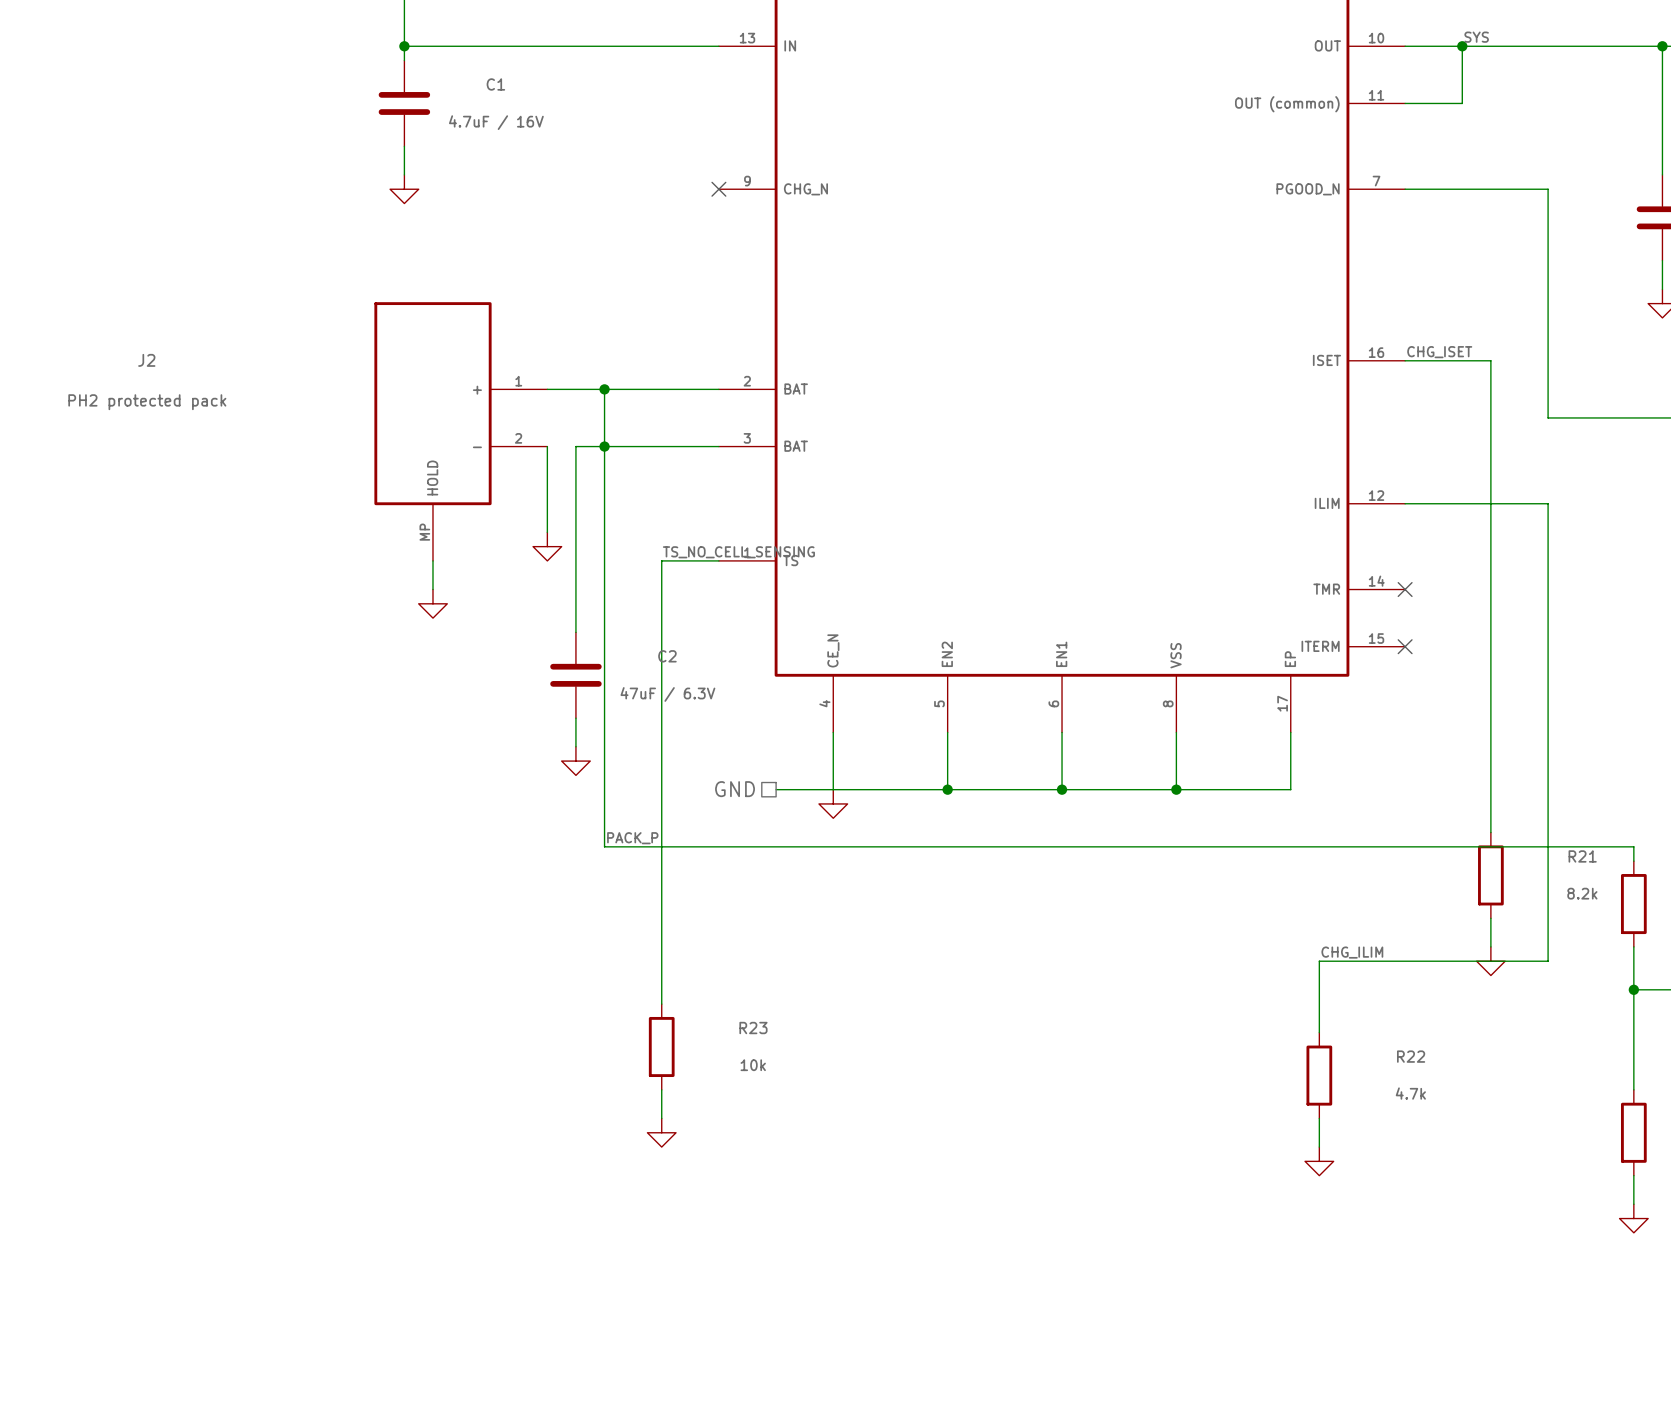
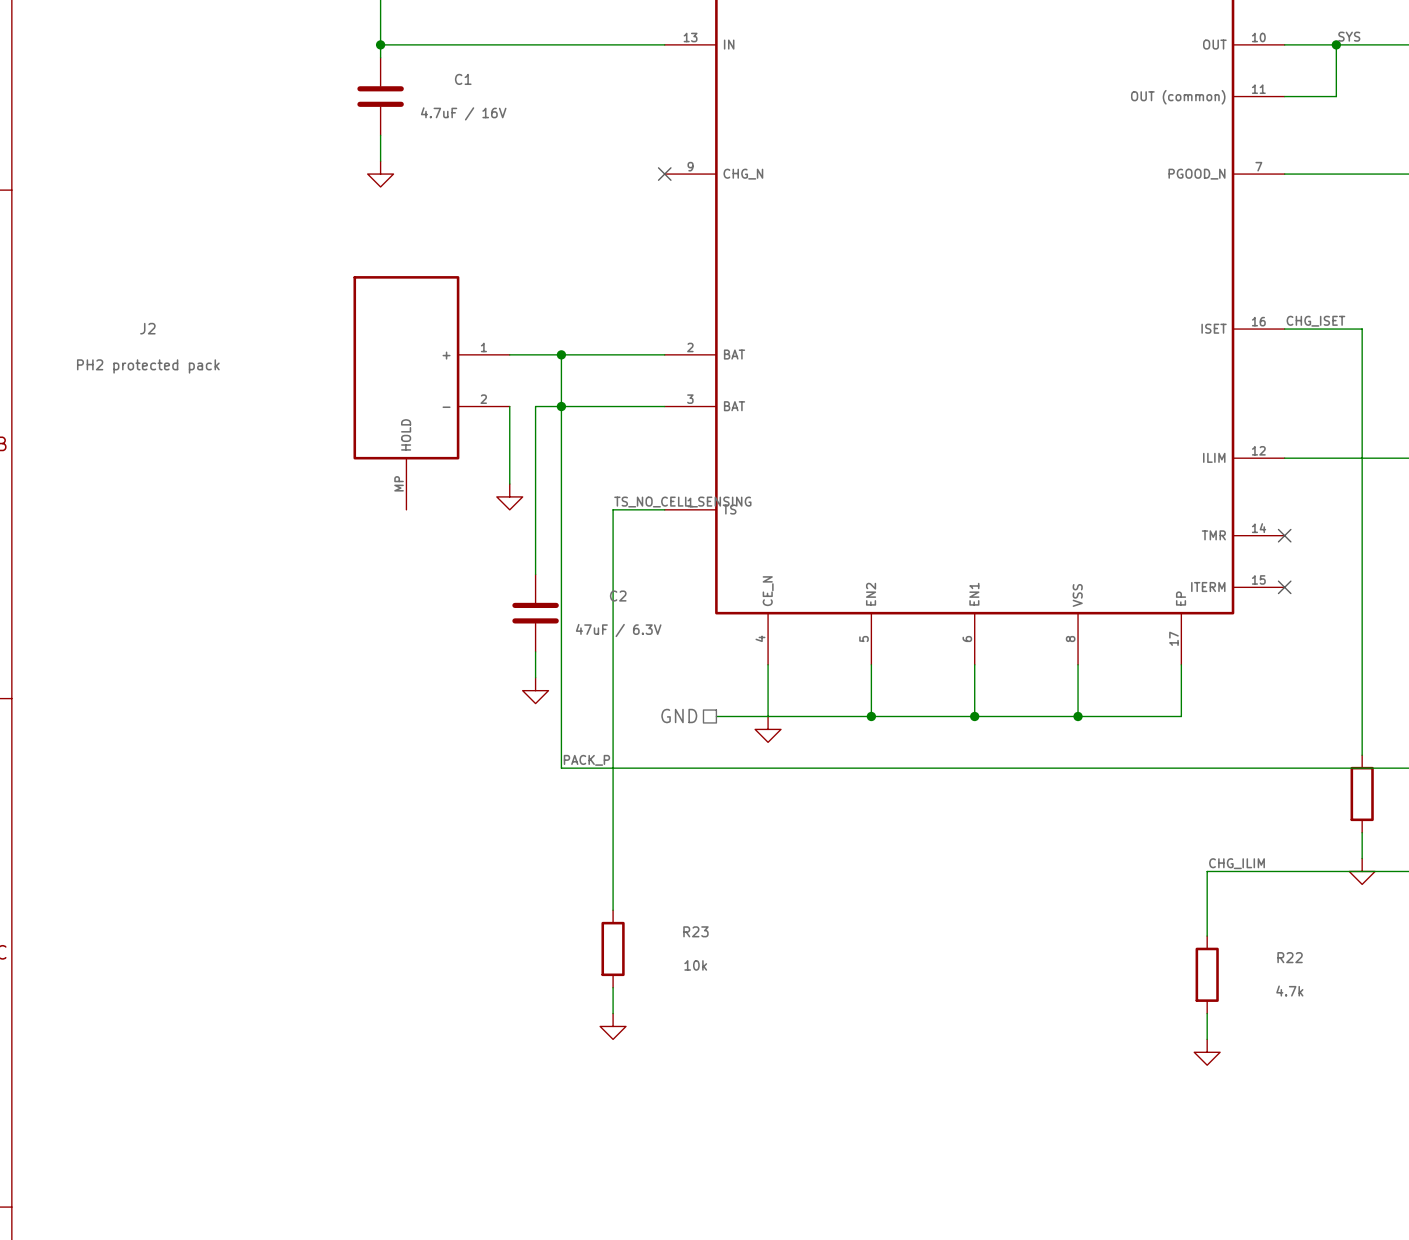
wire: (432, 560) (432, 589) -> none
power symbol: (432, 603) -> none

